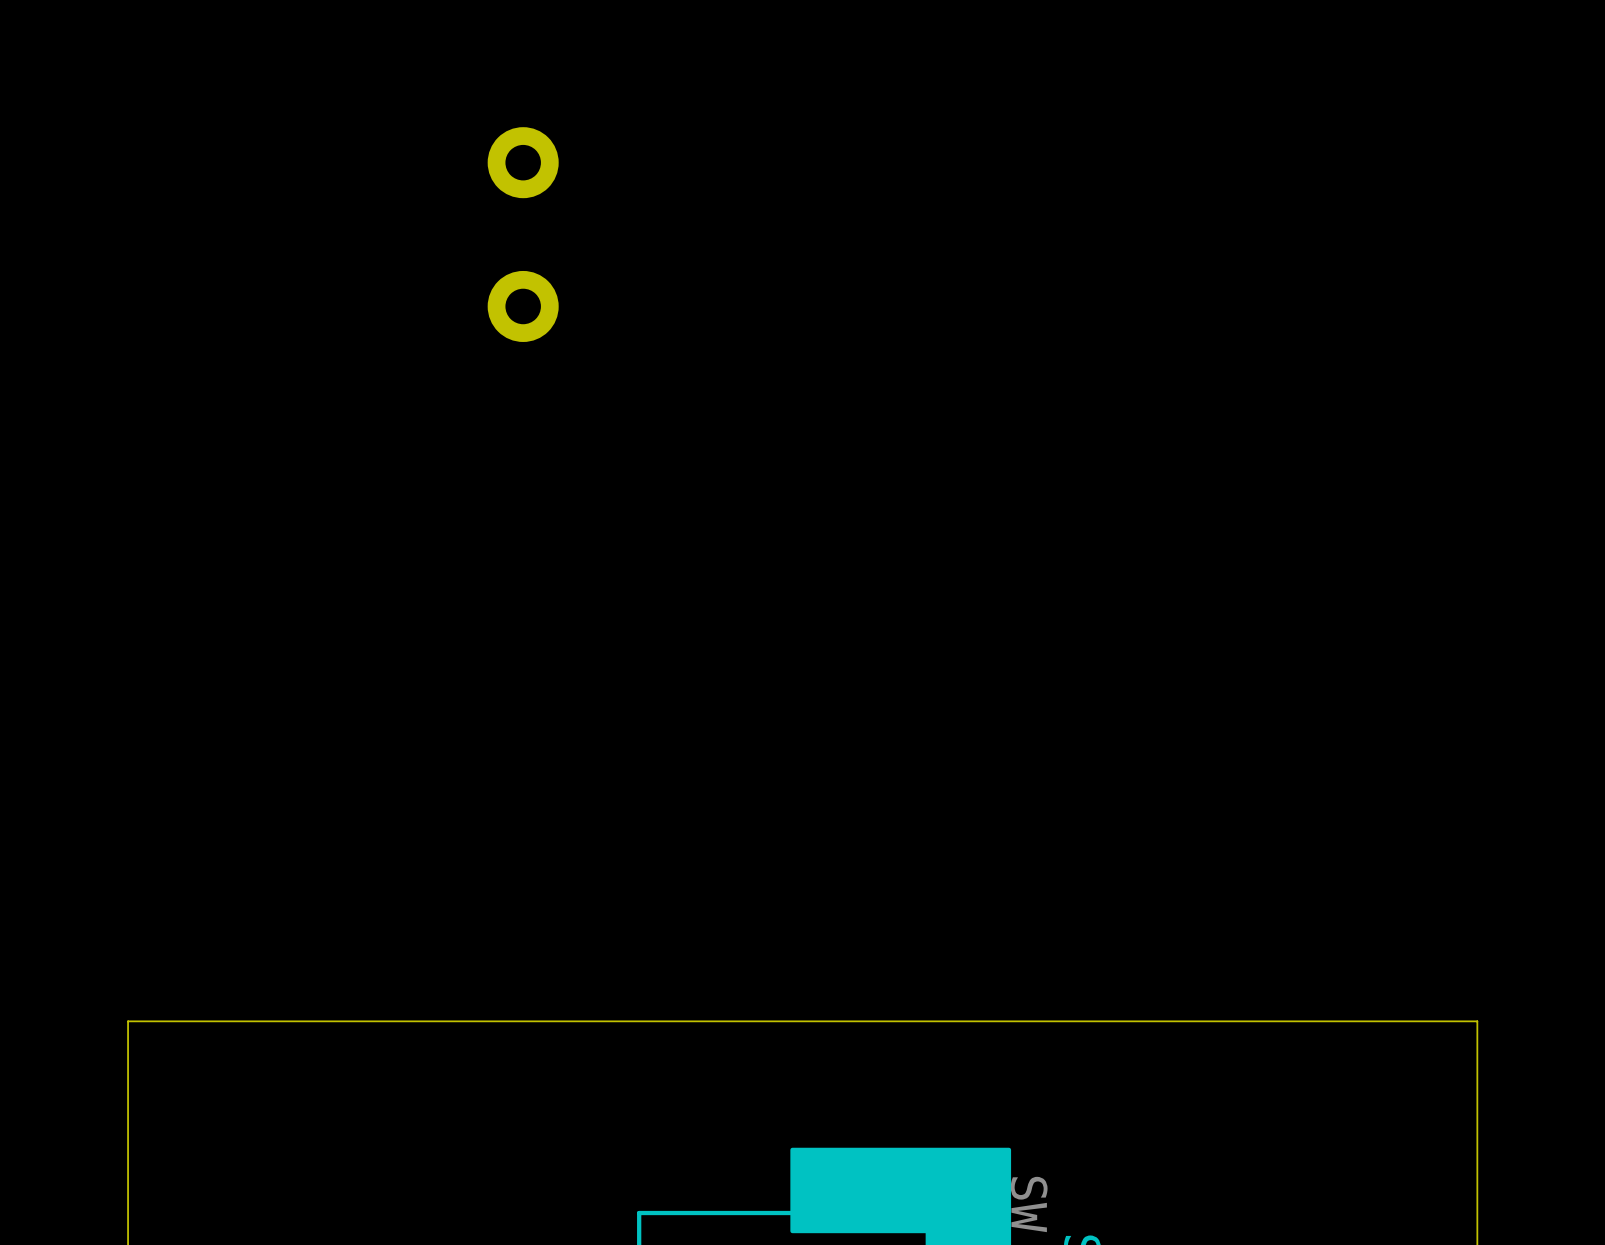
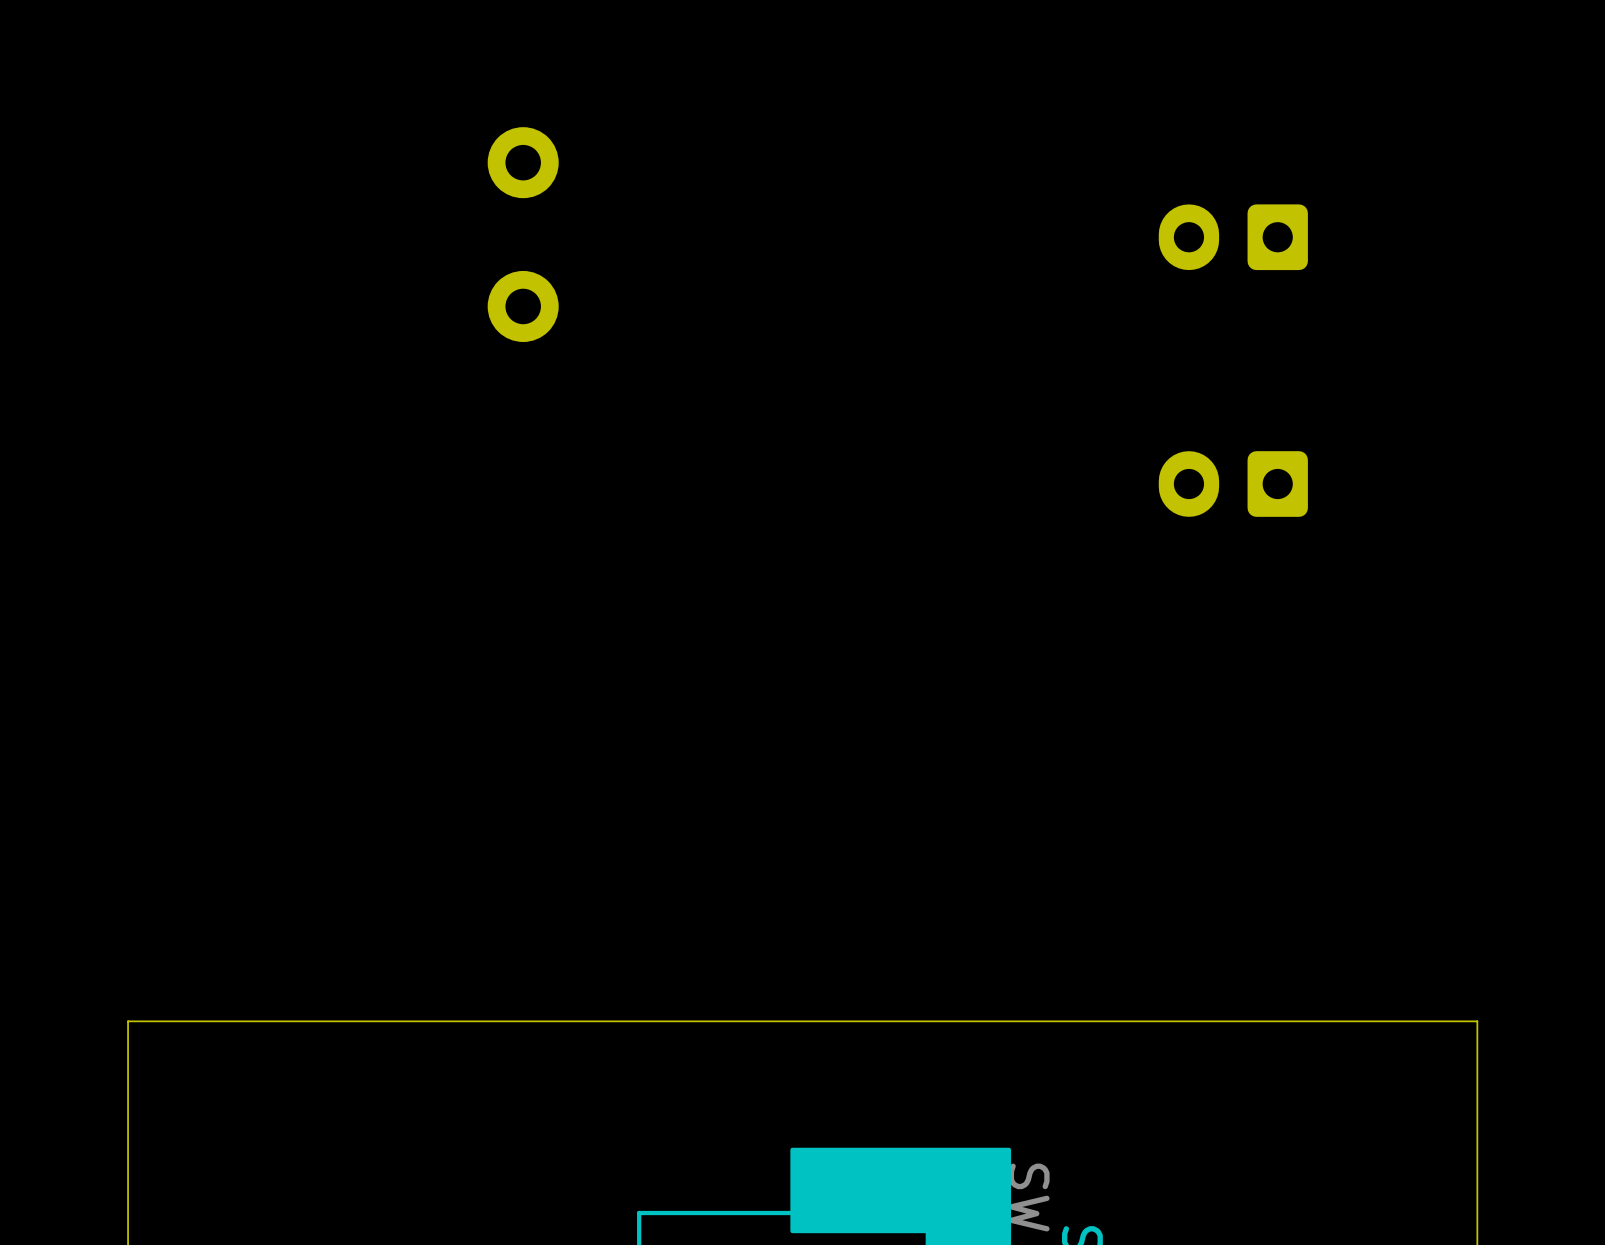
part: none -> (1233, 237)
part: none -> (1233, 484)

